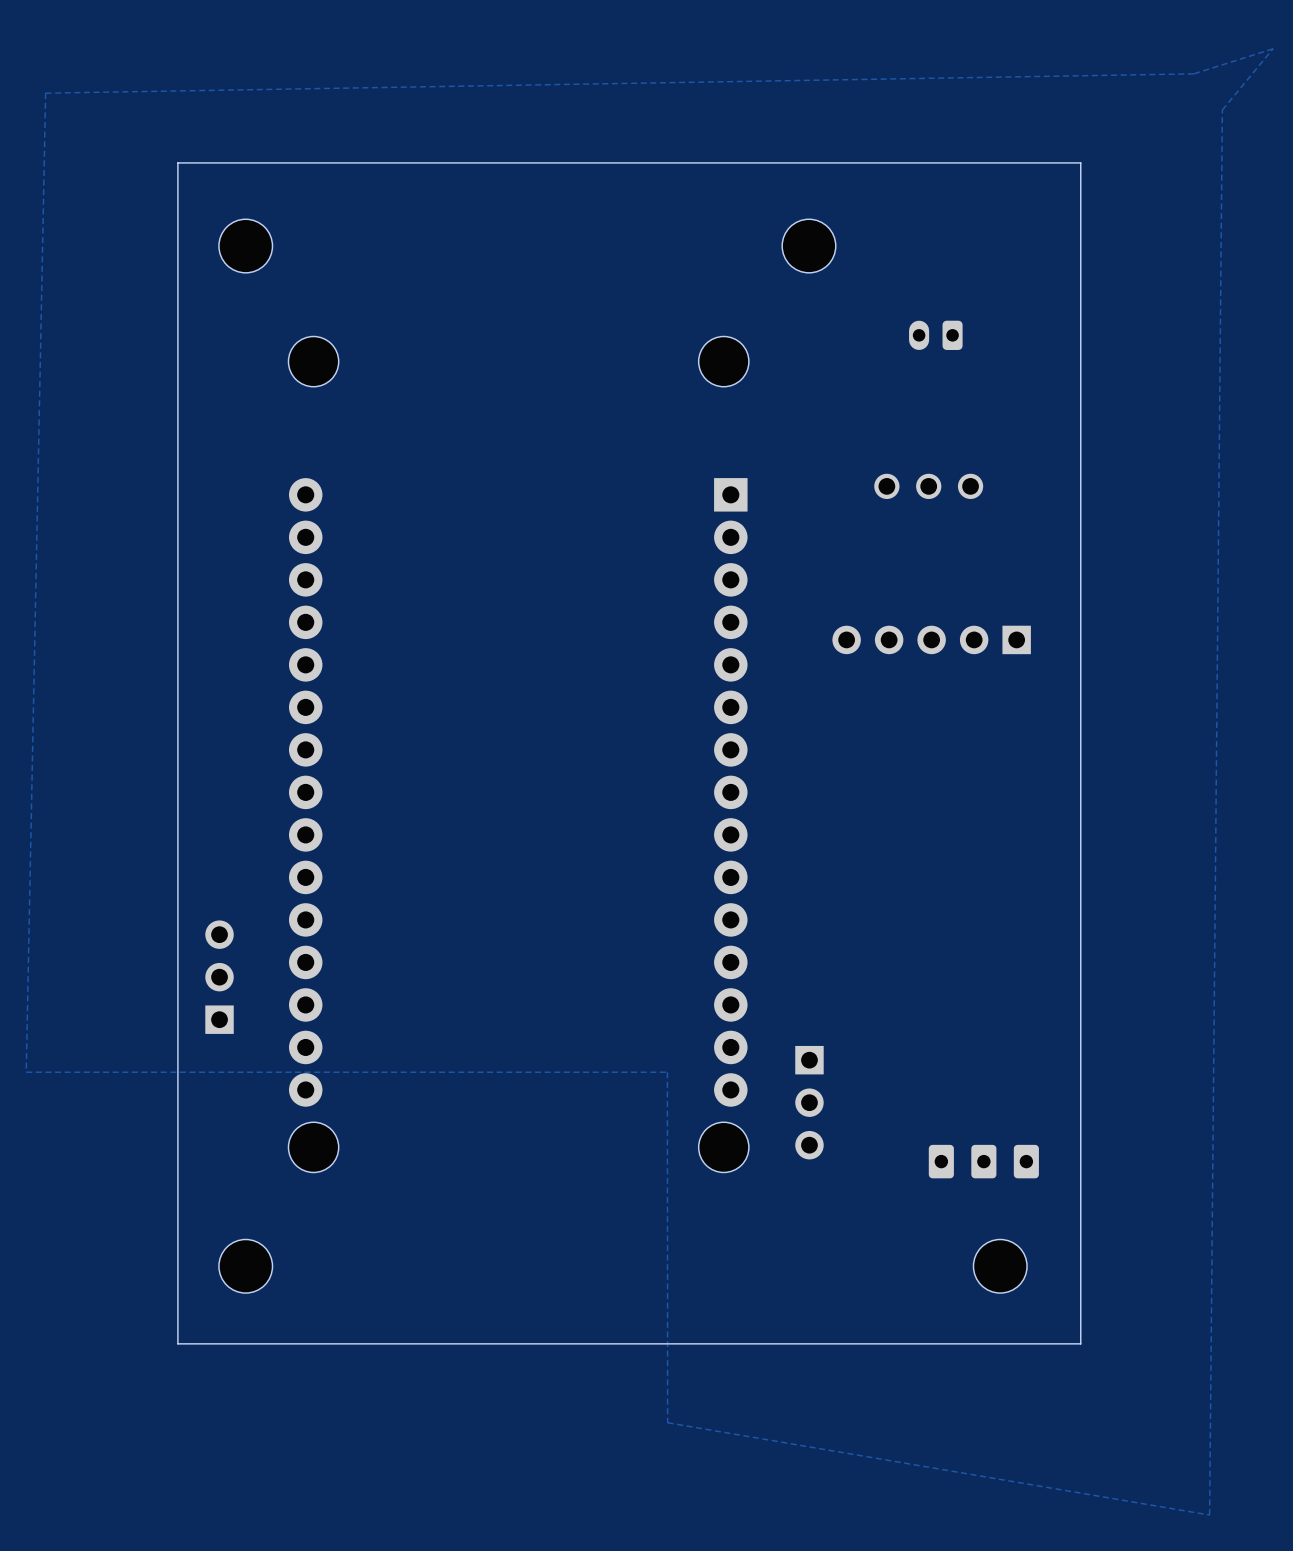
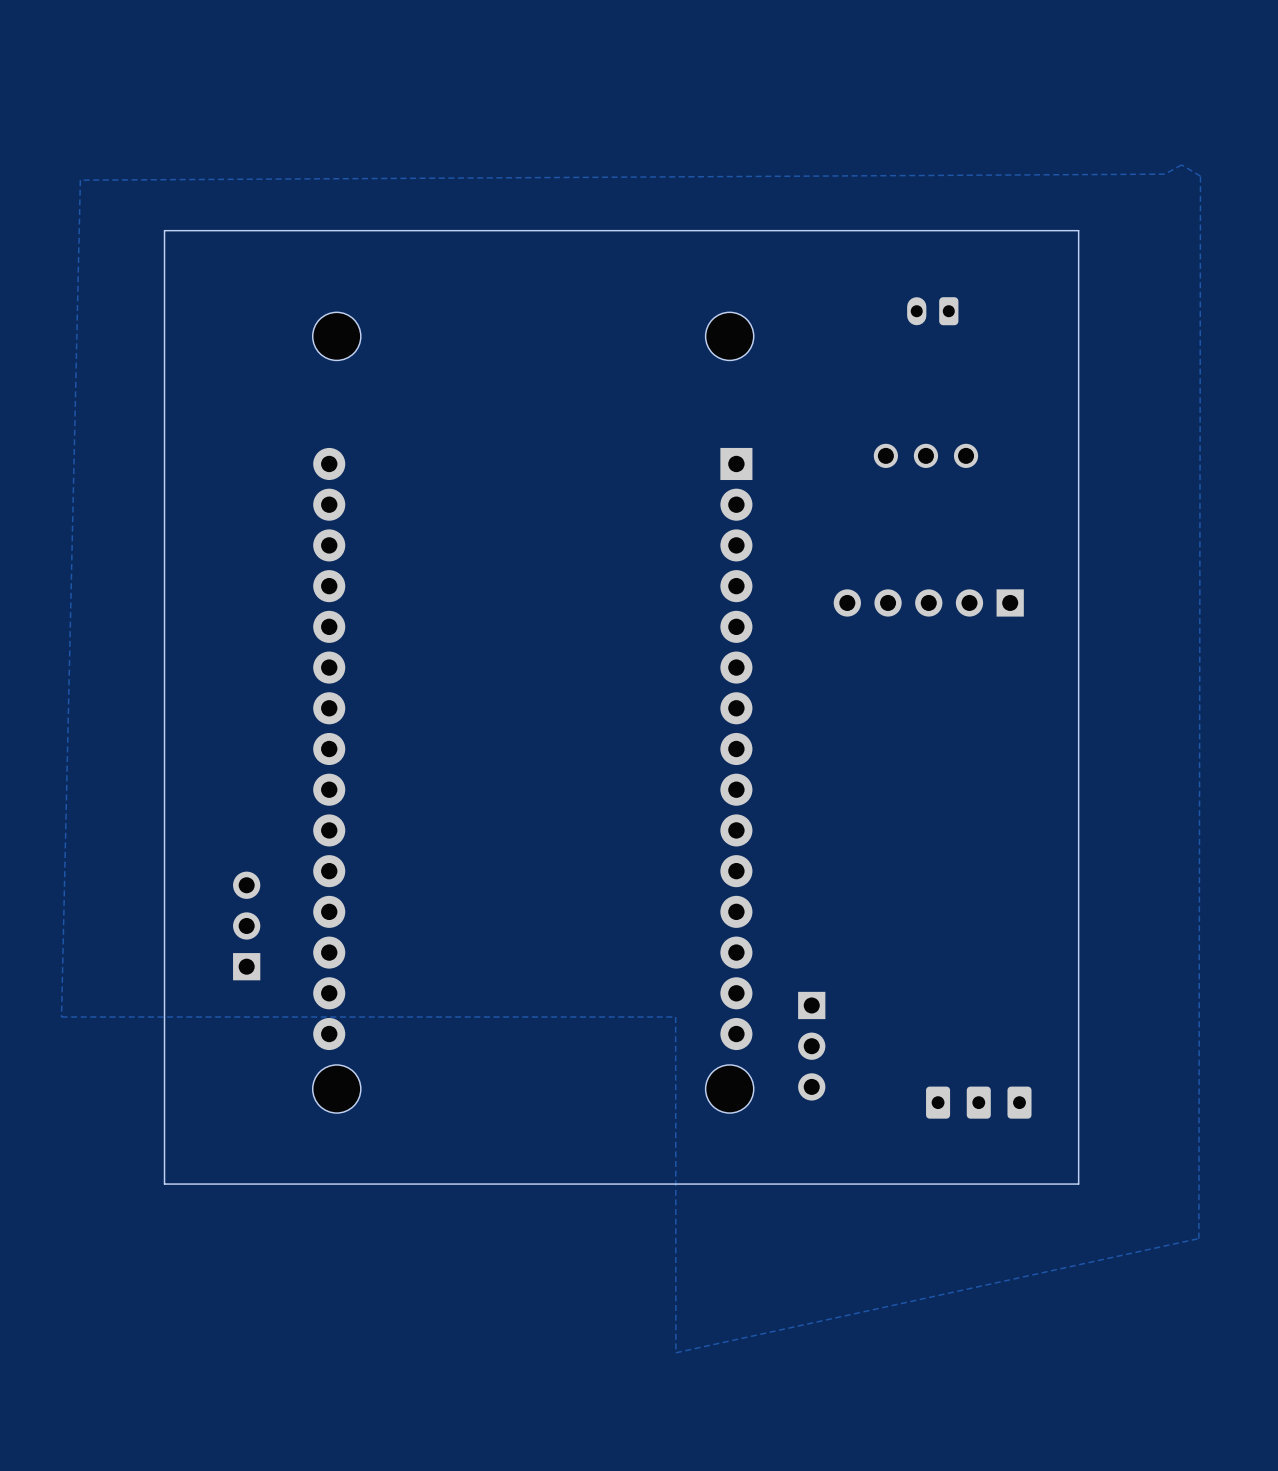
board edge: (1080, 162) (177, 162) (177, 1343) (1080, 1343) (1080, 162) -> (1078, 230) (1078, 1184) (164, 1184) (164, 230) (1078, 230)
part: (245, 246) -> none
part: (808, 246) -> none
zone outline: (26, 1072) (45, 93) (1193, 73) (1273, 48) (1222, 110) (1209, 1515) (667, 1422) -> (61, 1017) (80, 180) (1164, 174) (1181, 164) (1200, 176) (1198, 1238) (675, 1352)
part: (245, 1266) -> none
part: (1000, 1266) -> none

